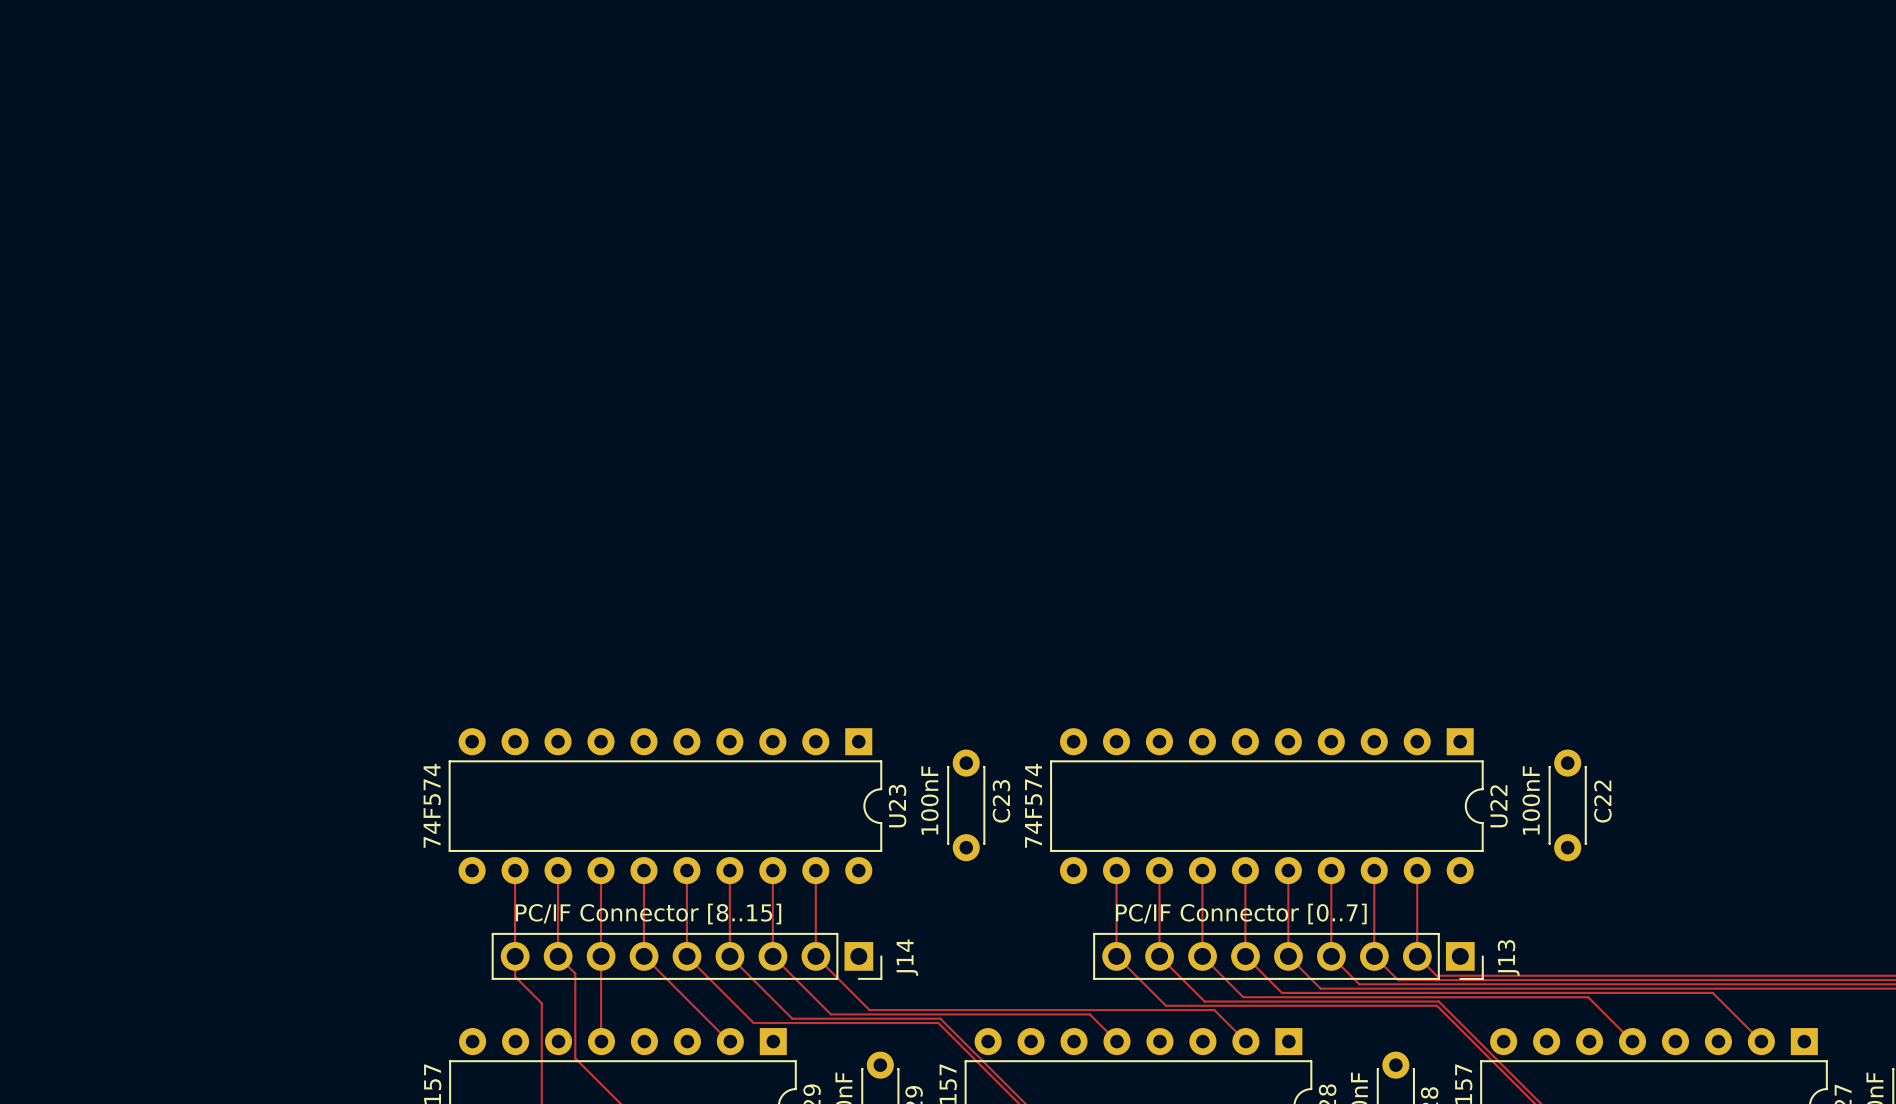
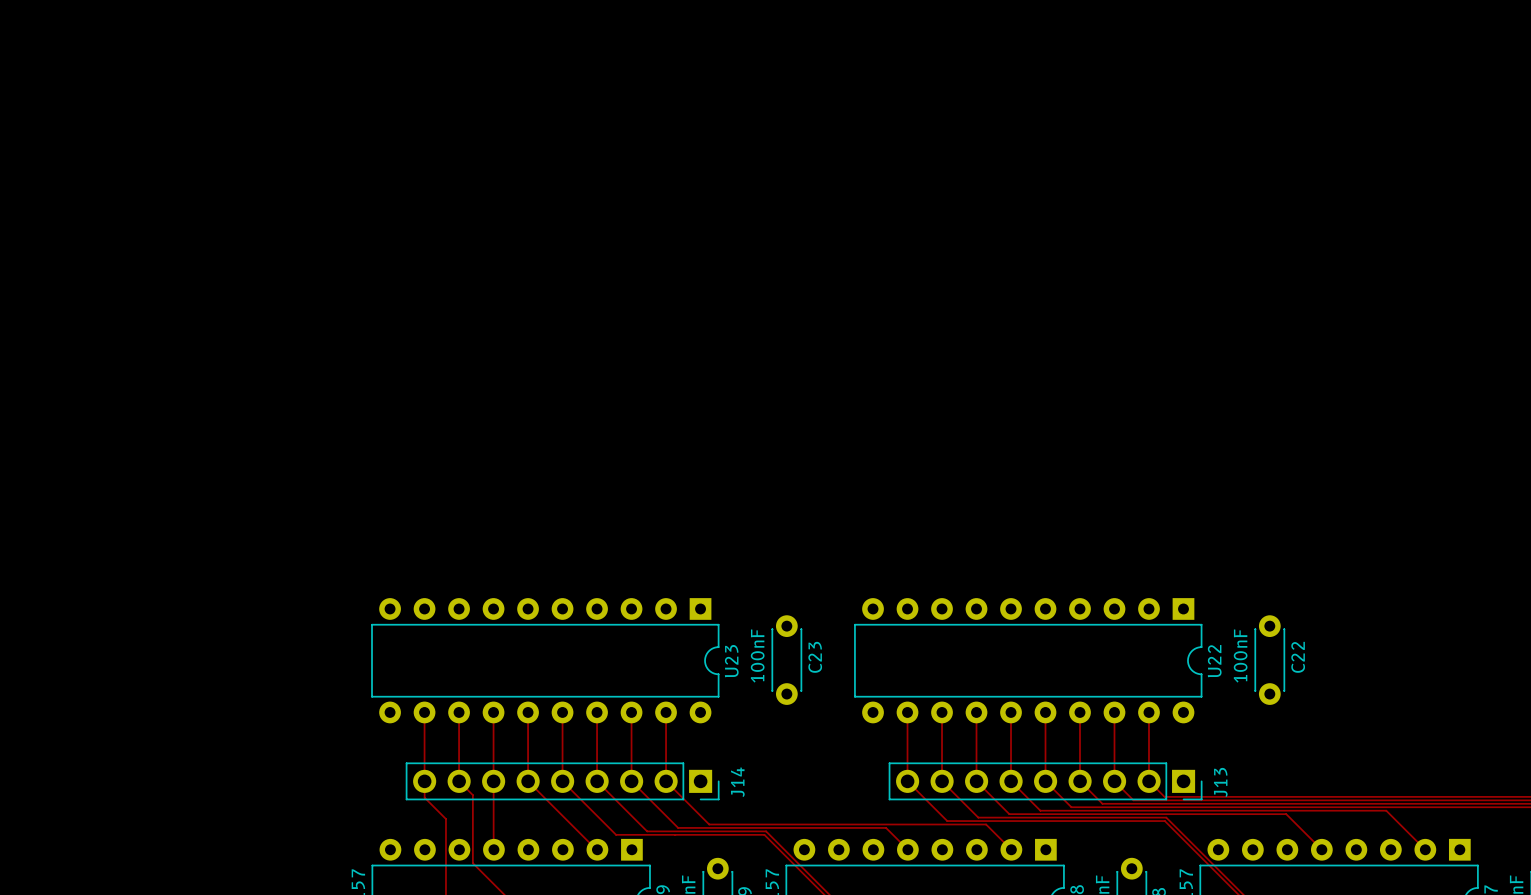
U23 value: 74F574 (432, 805) -> none
U22 value: 74F574 (1033, 805) -> none
J14 value: PC/IF Connector [8..15] (648, 913) -> none
J13 value: PC/IF Connector [0..7] (1241, 913) -> none

